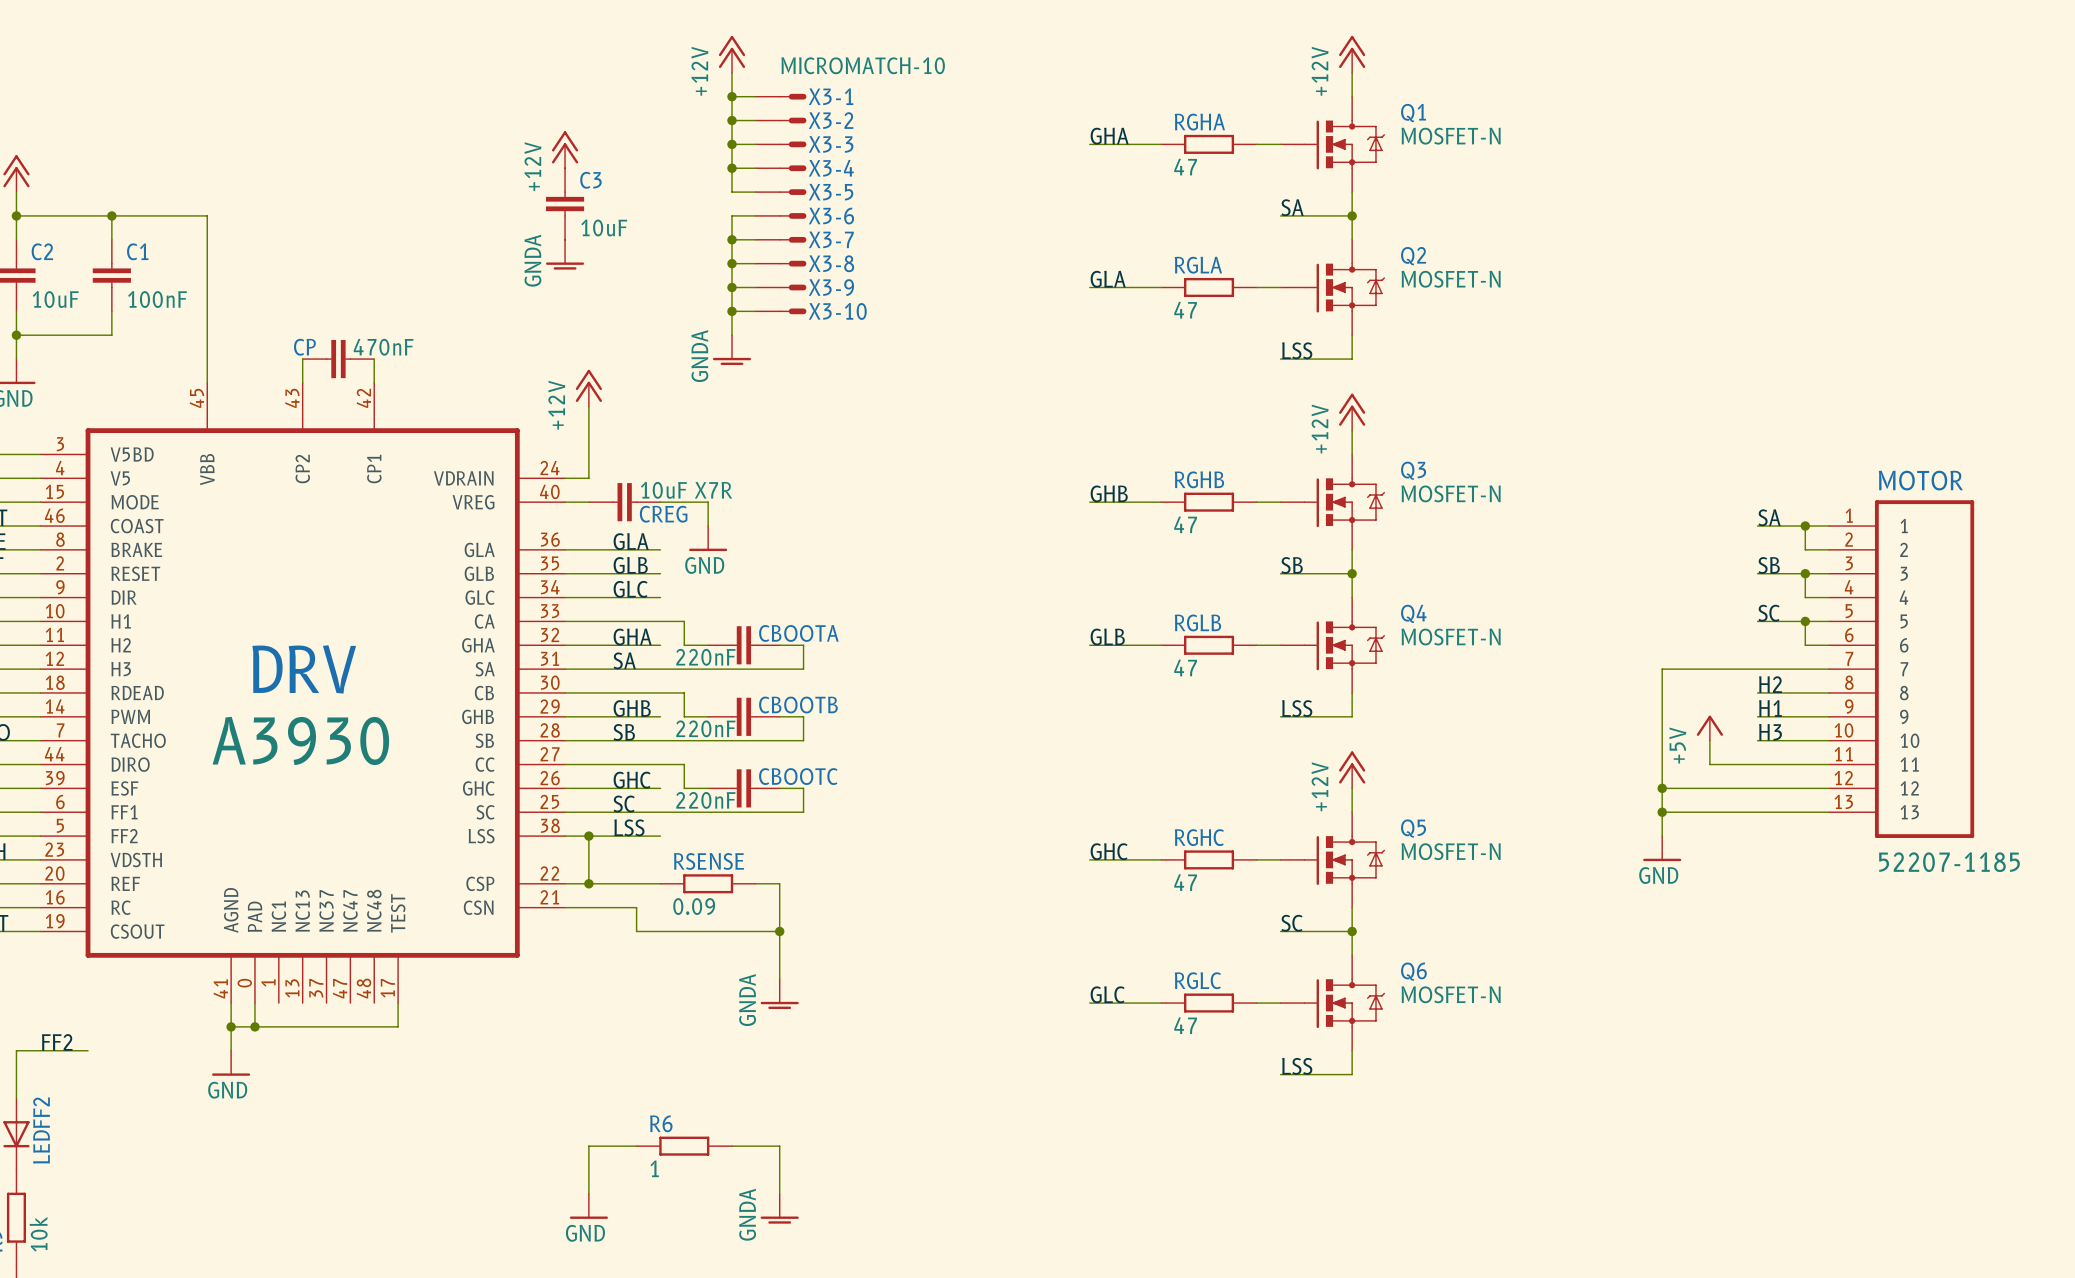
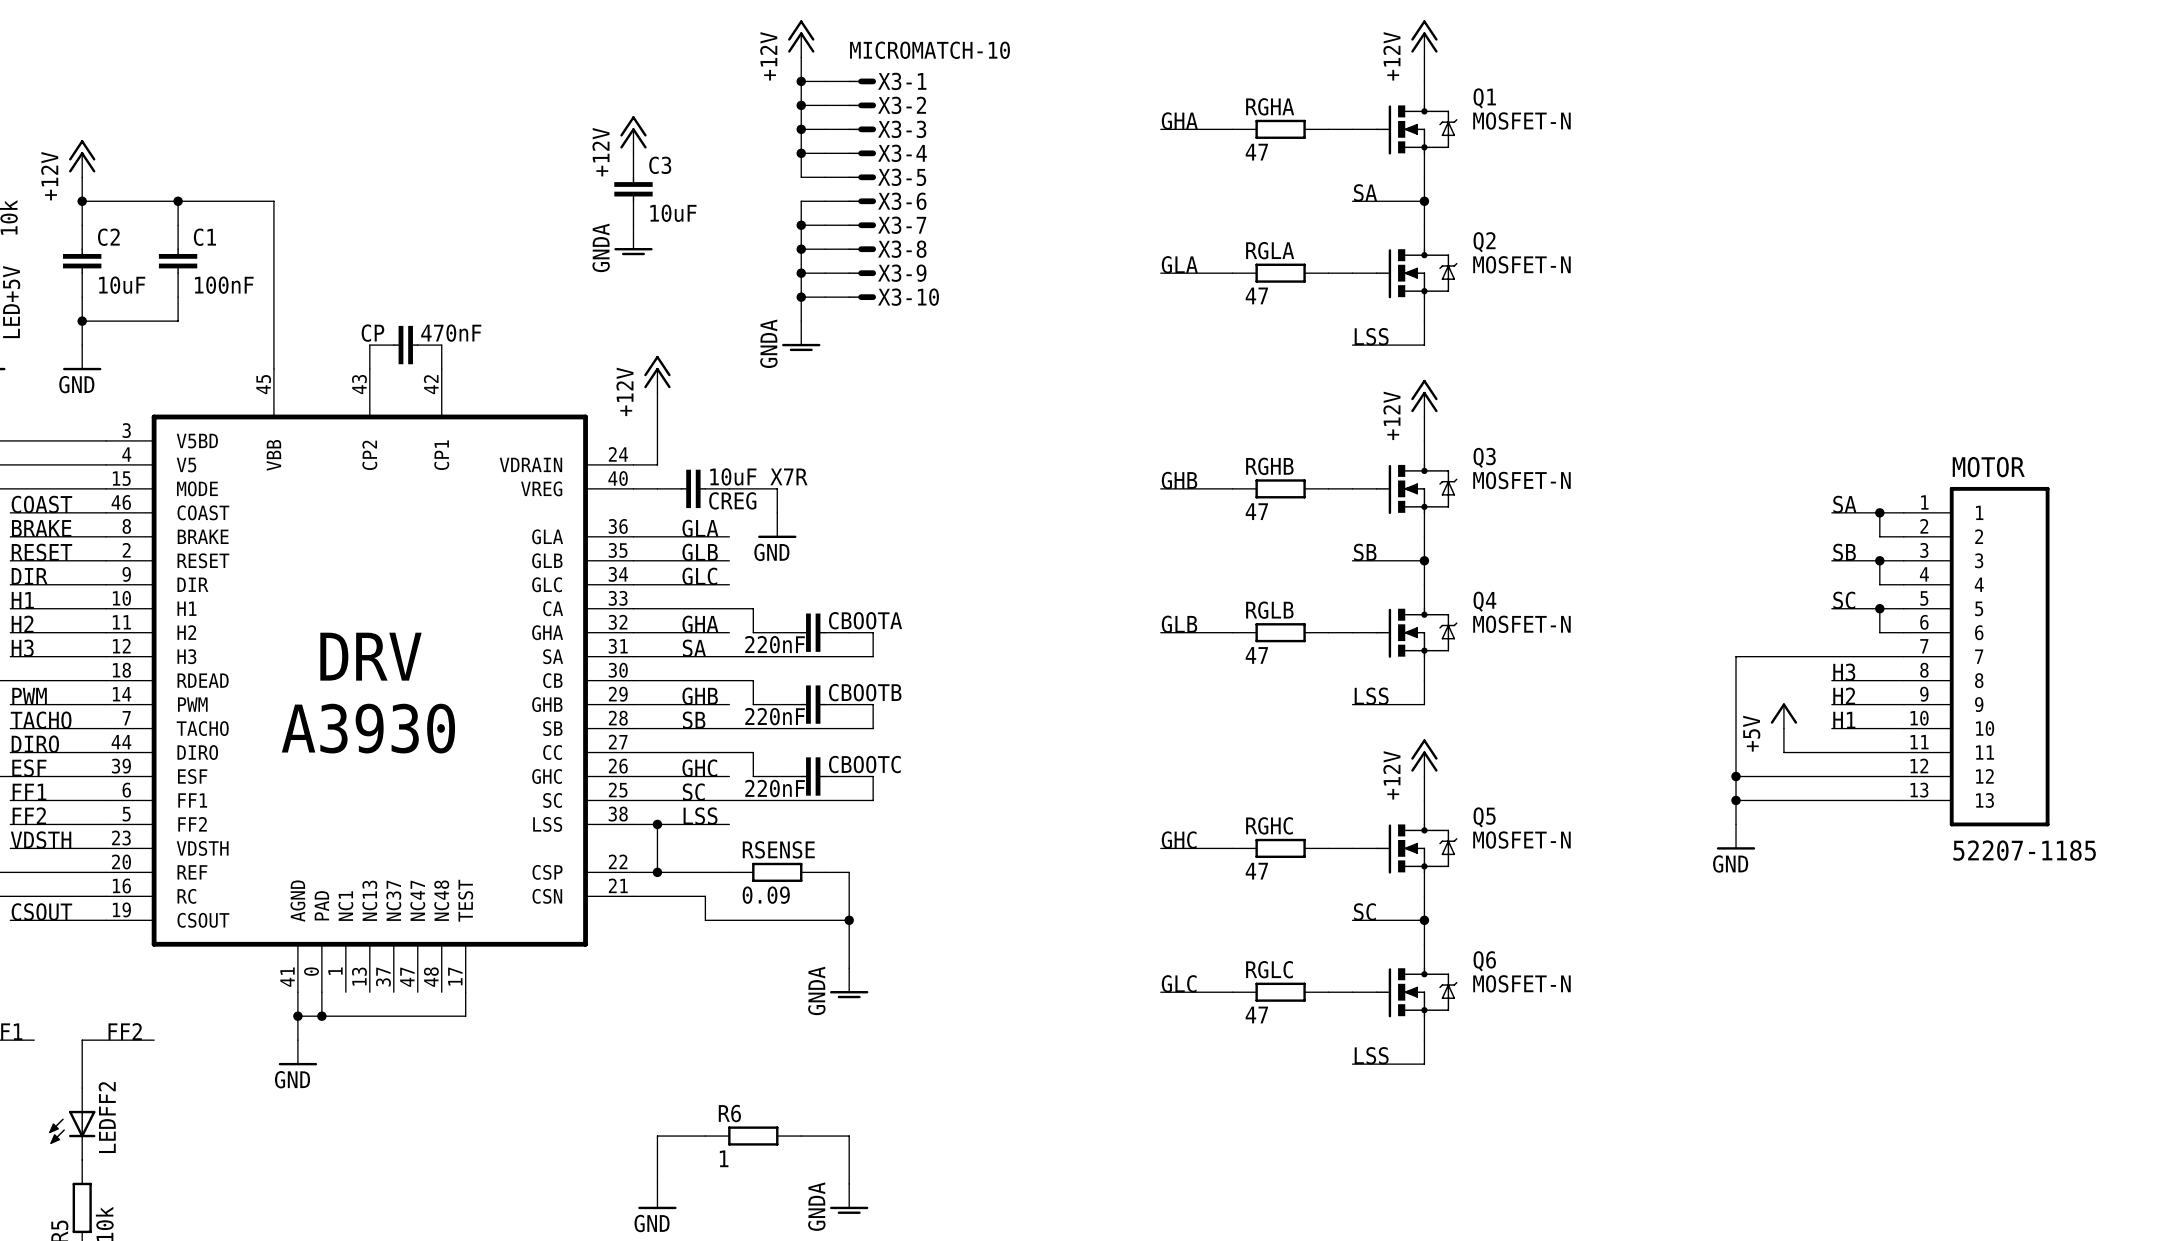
label: H2 (1770, 684) -> H3 (1844, 672)
label: H1 (1770, 708) -> H2 (1844, 696)
label: H3 (1770, 732) -> H1 (1844, 720)

